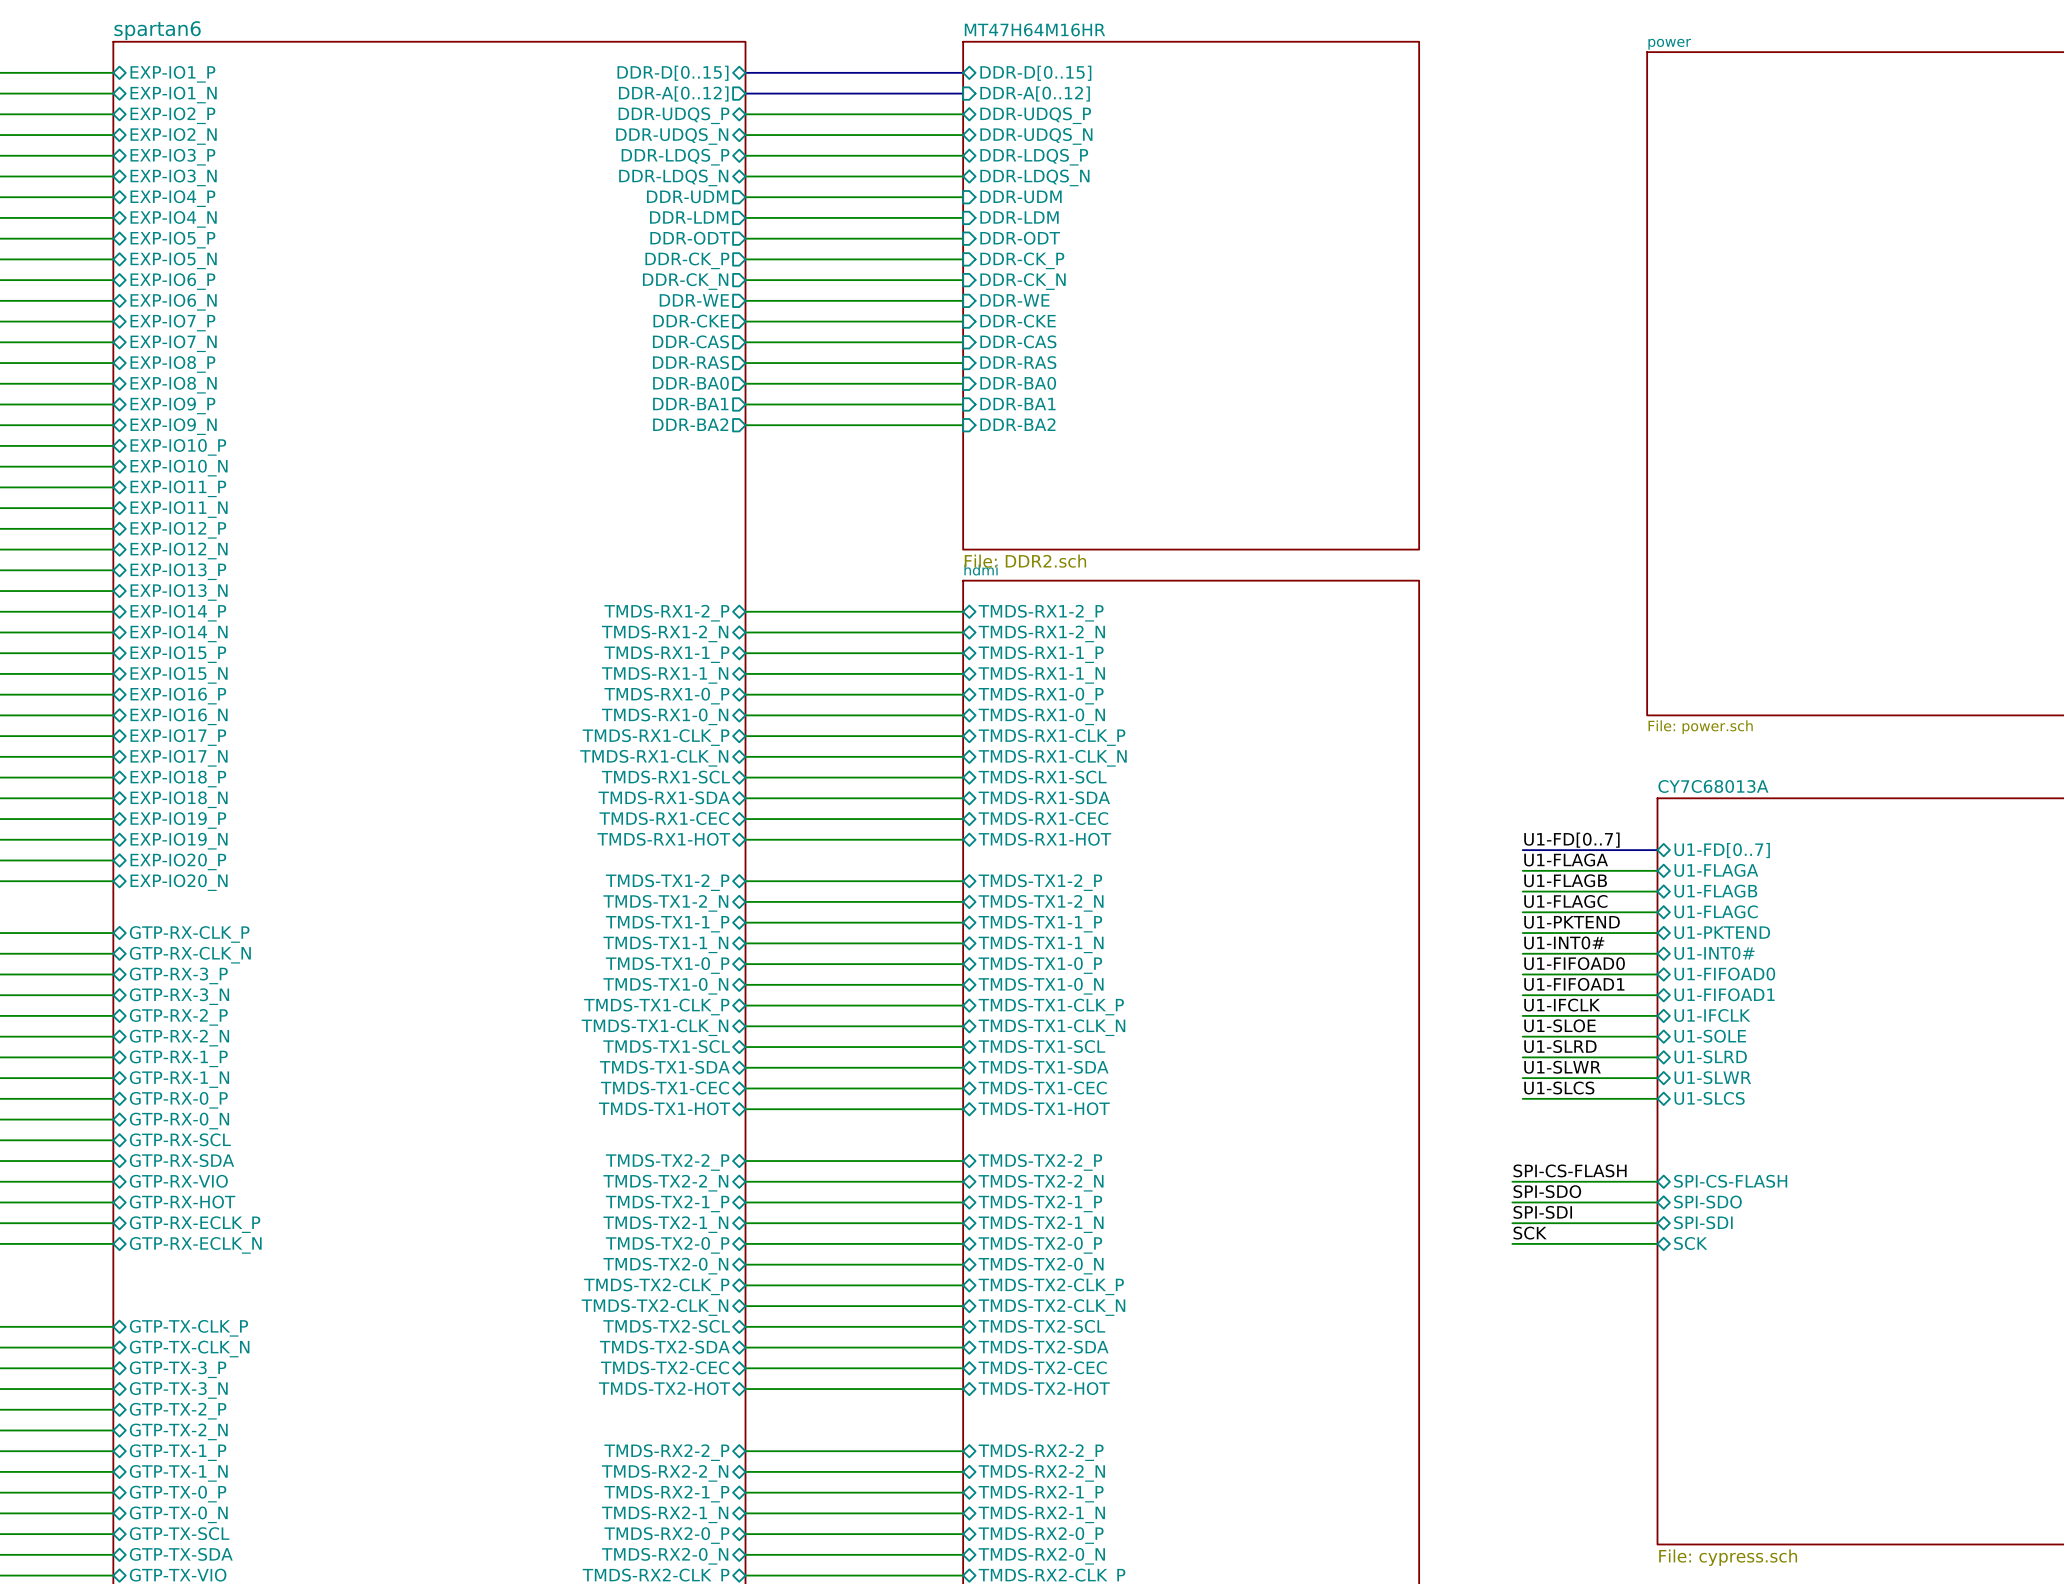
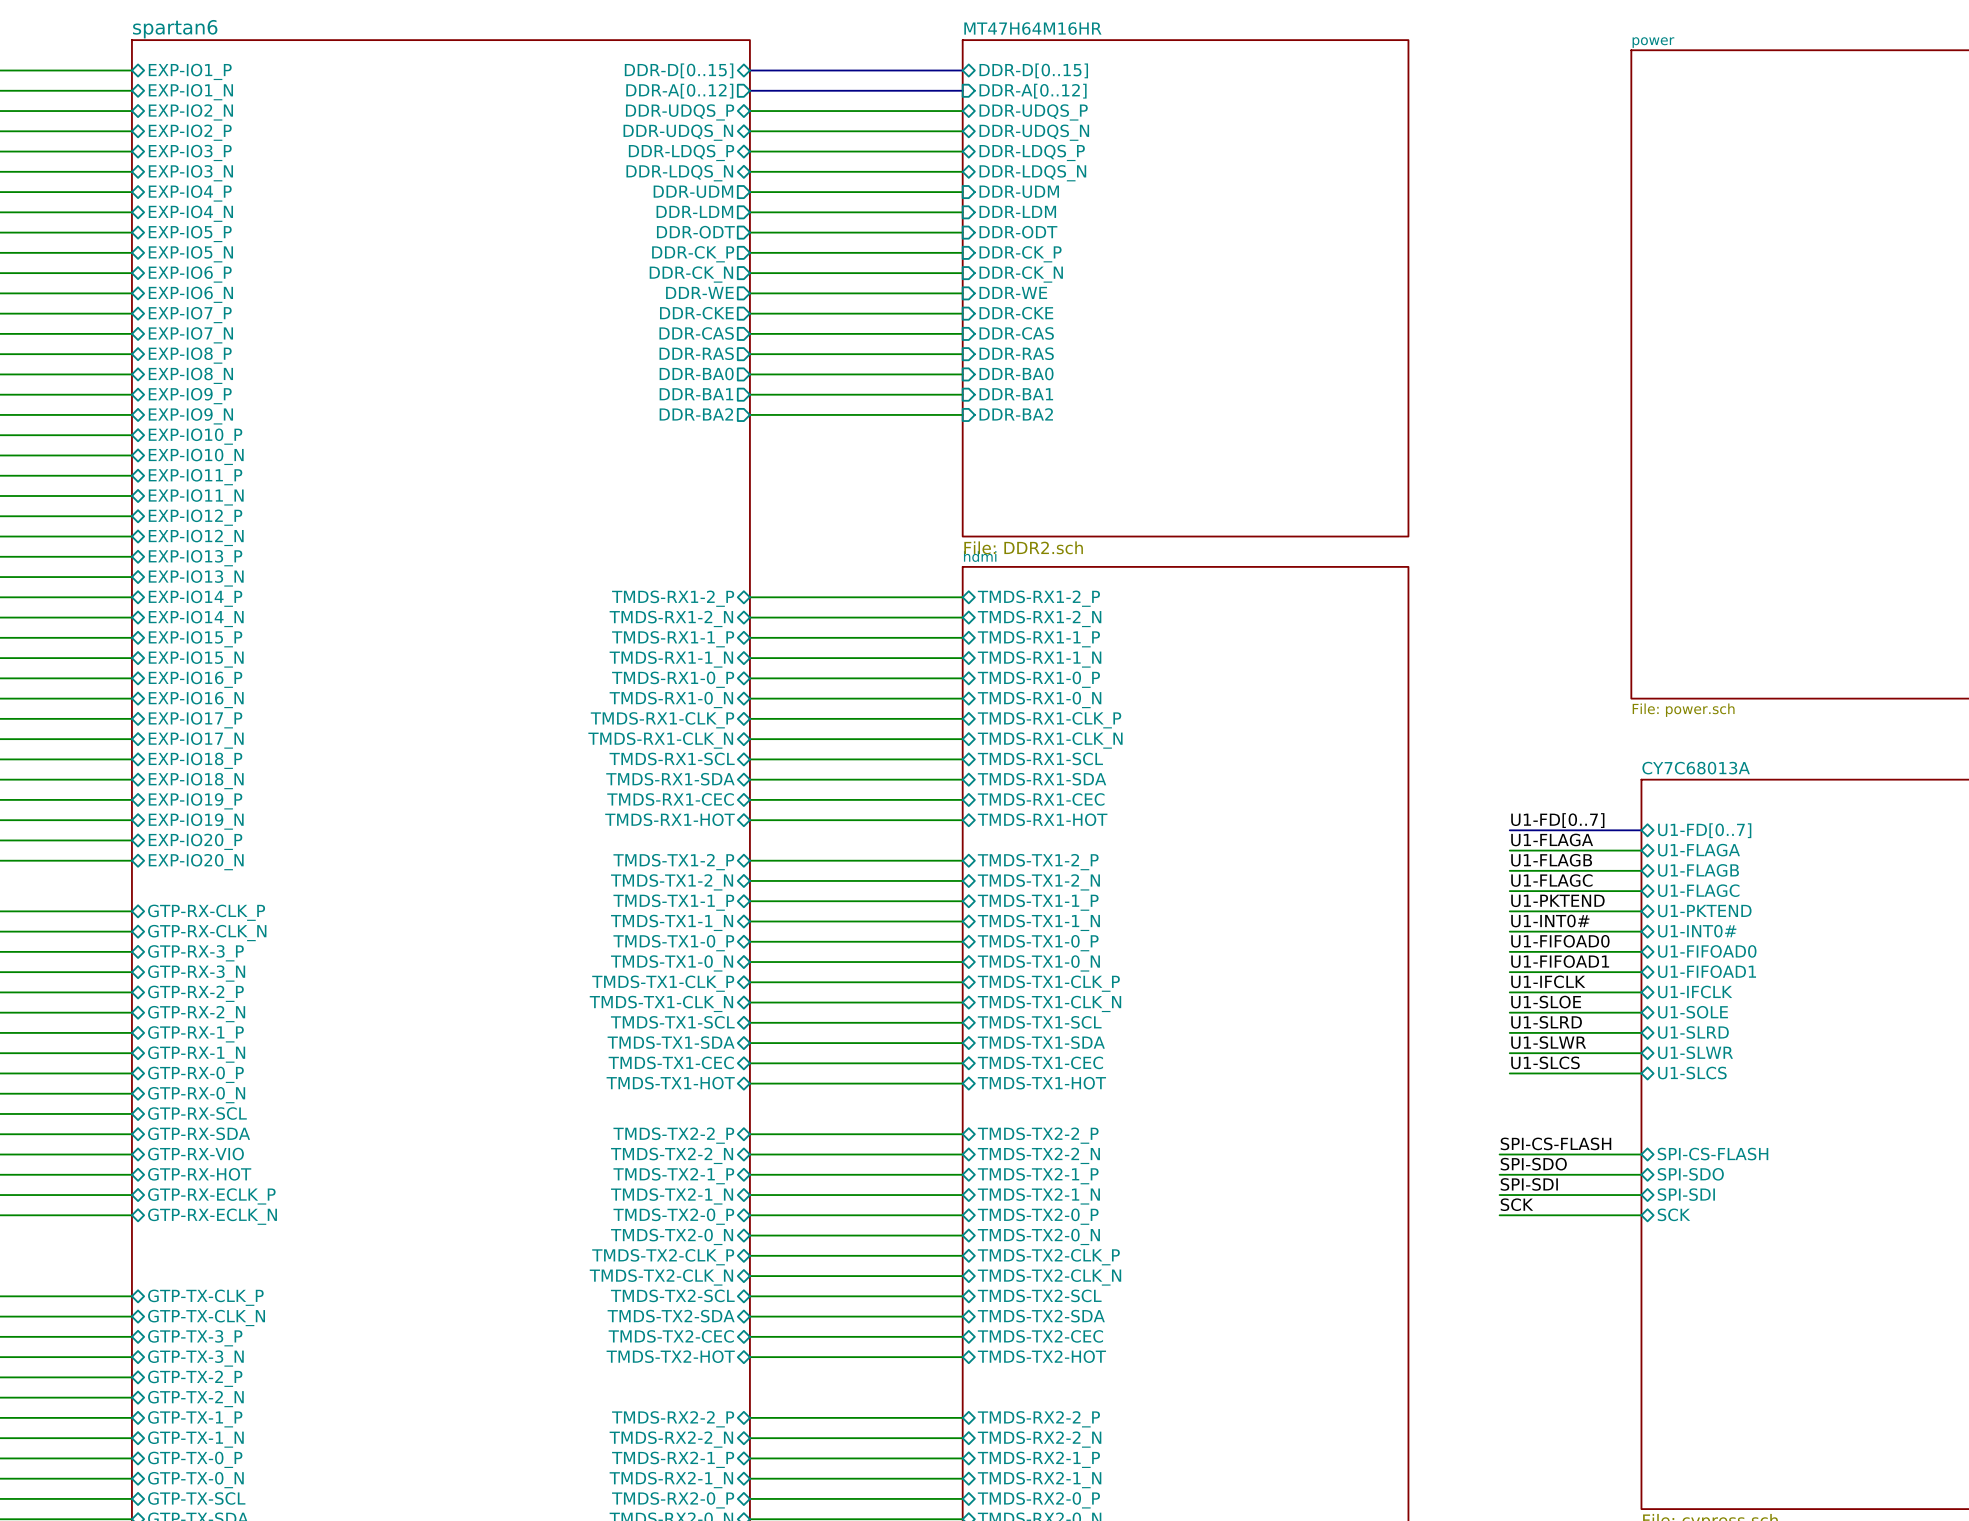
sheet pin: EXP-IO2_P (172, 115) -> EXP-IO2_N (190, 112)
sheet pin: EXP-IO2_N (173, 136) -> EXP-IO2_P (190, 132)

